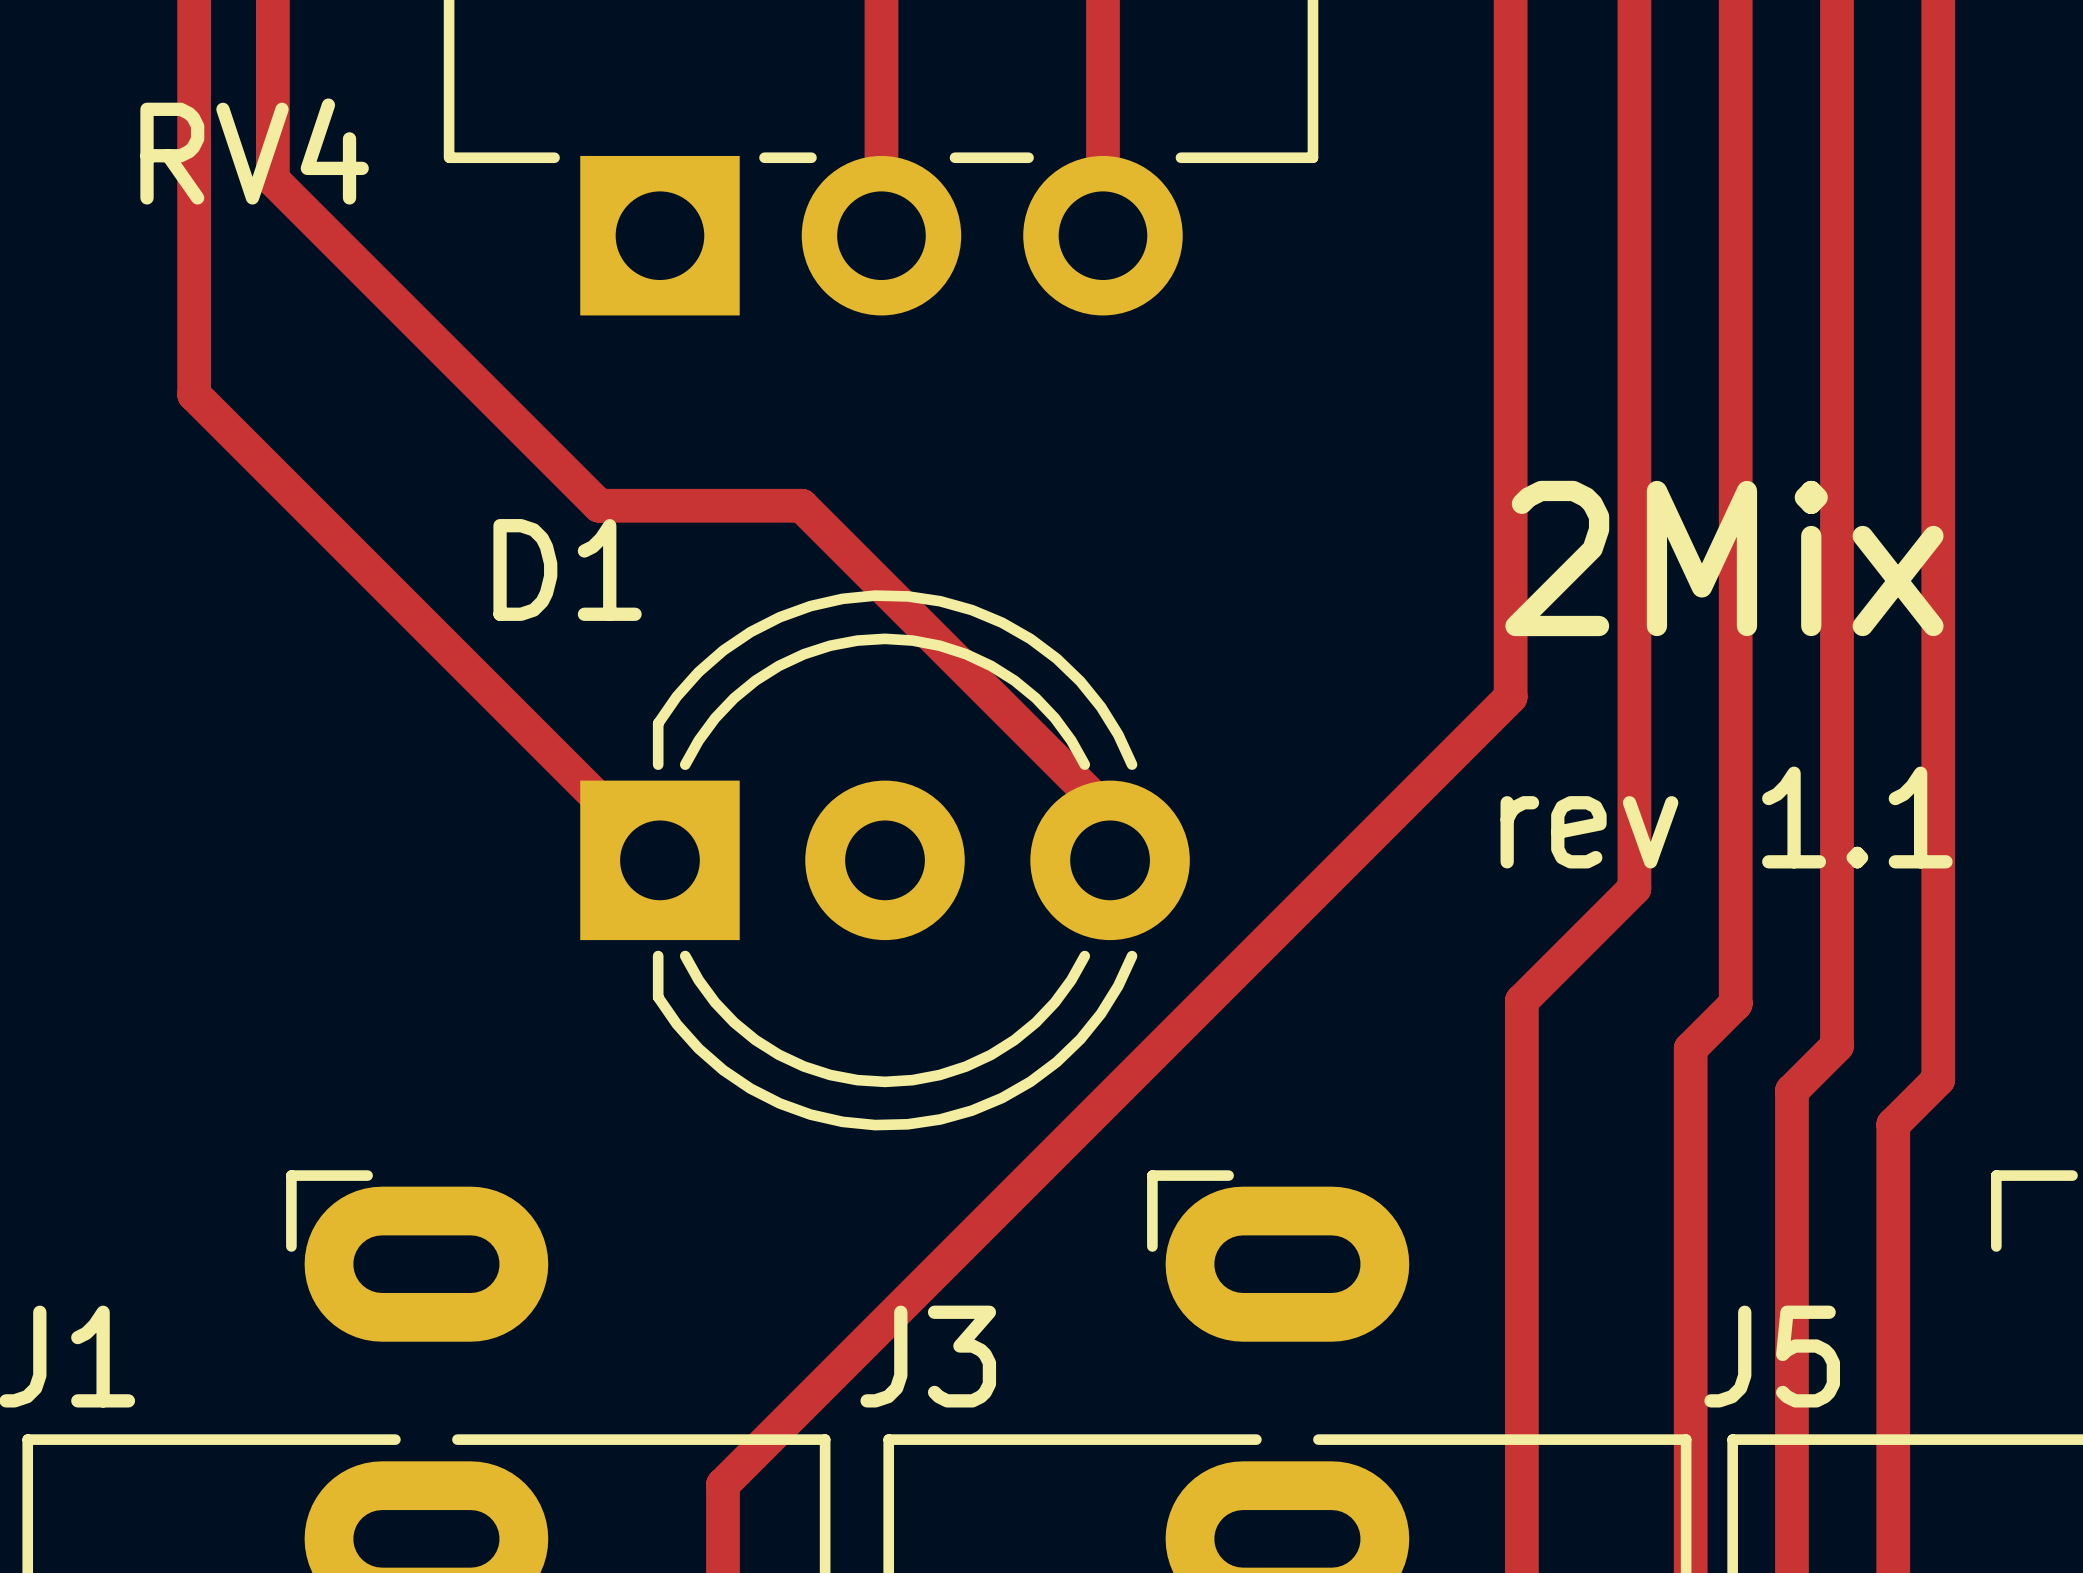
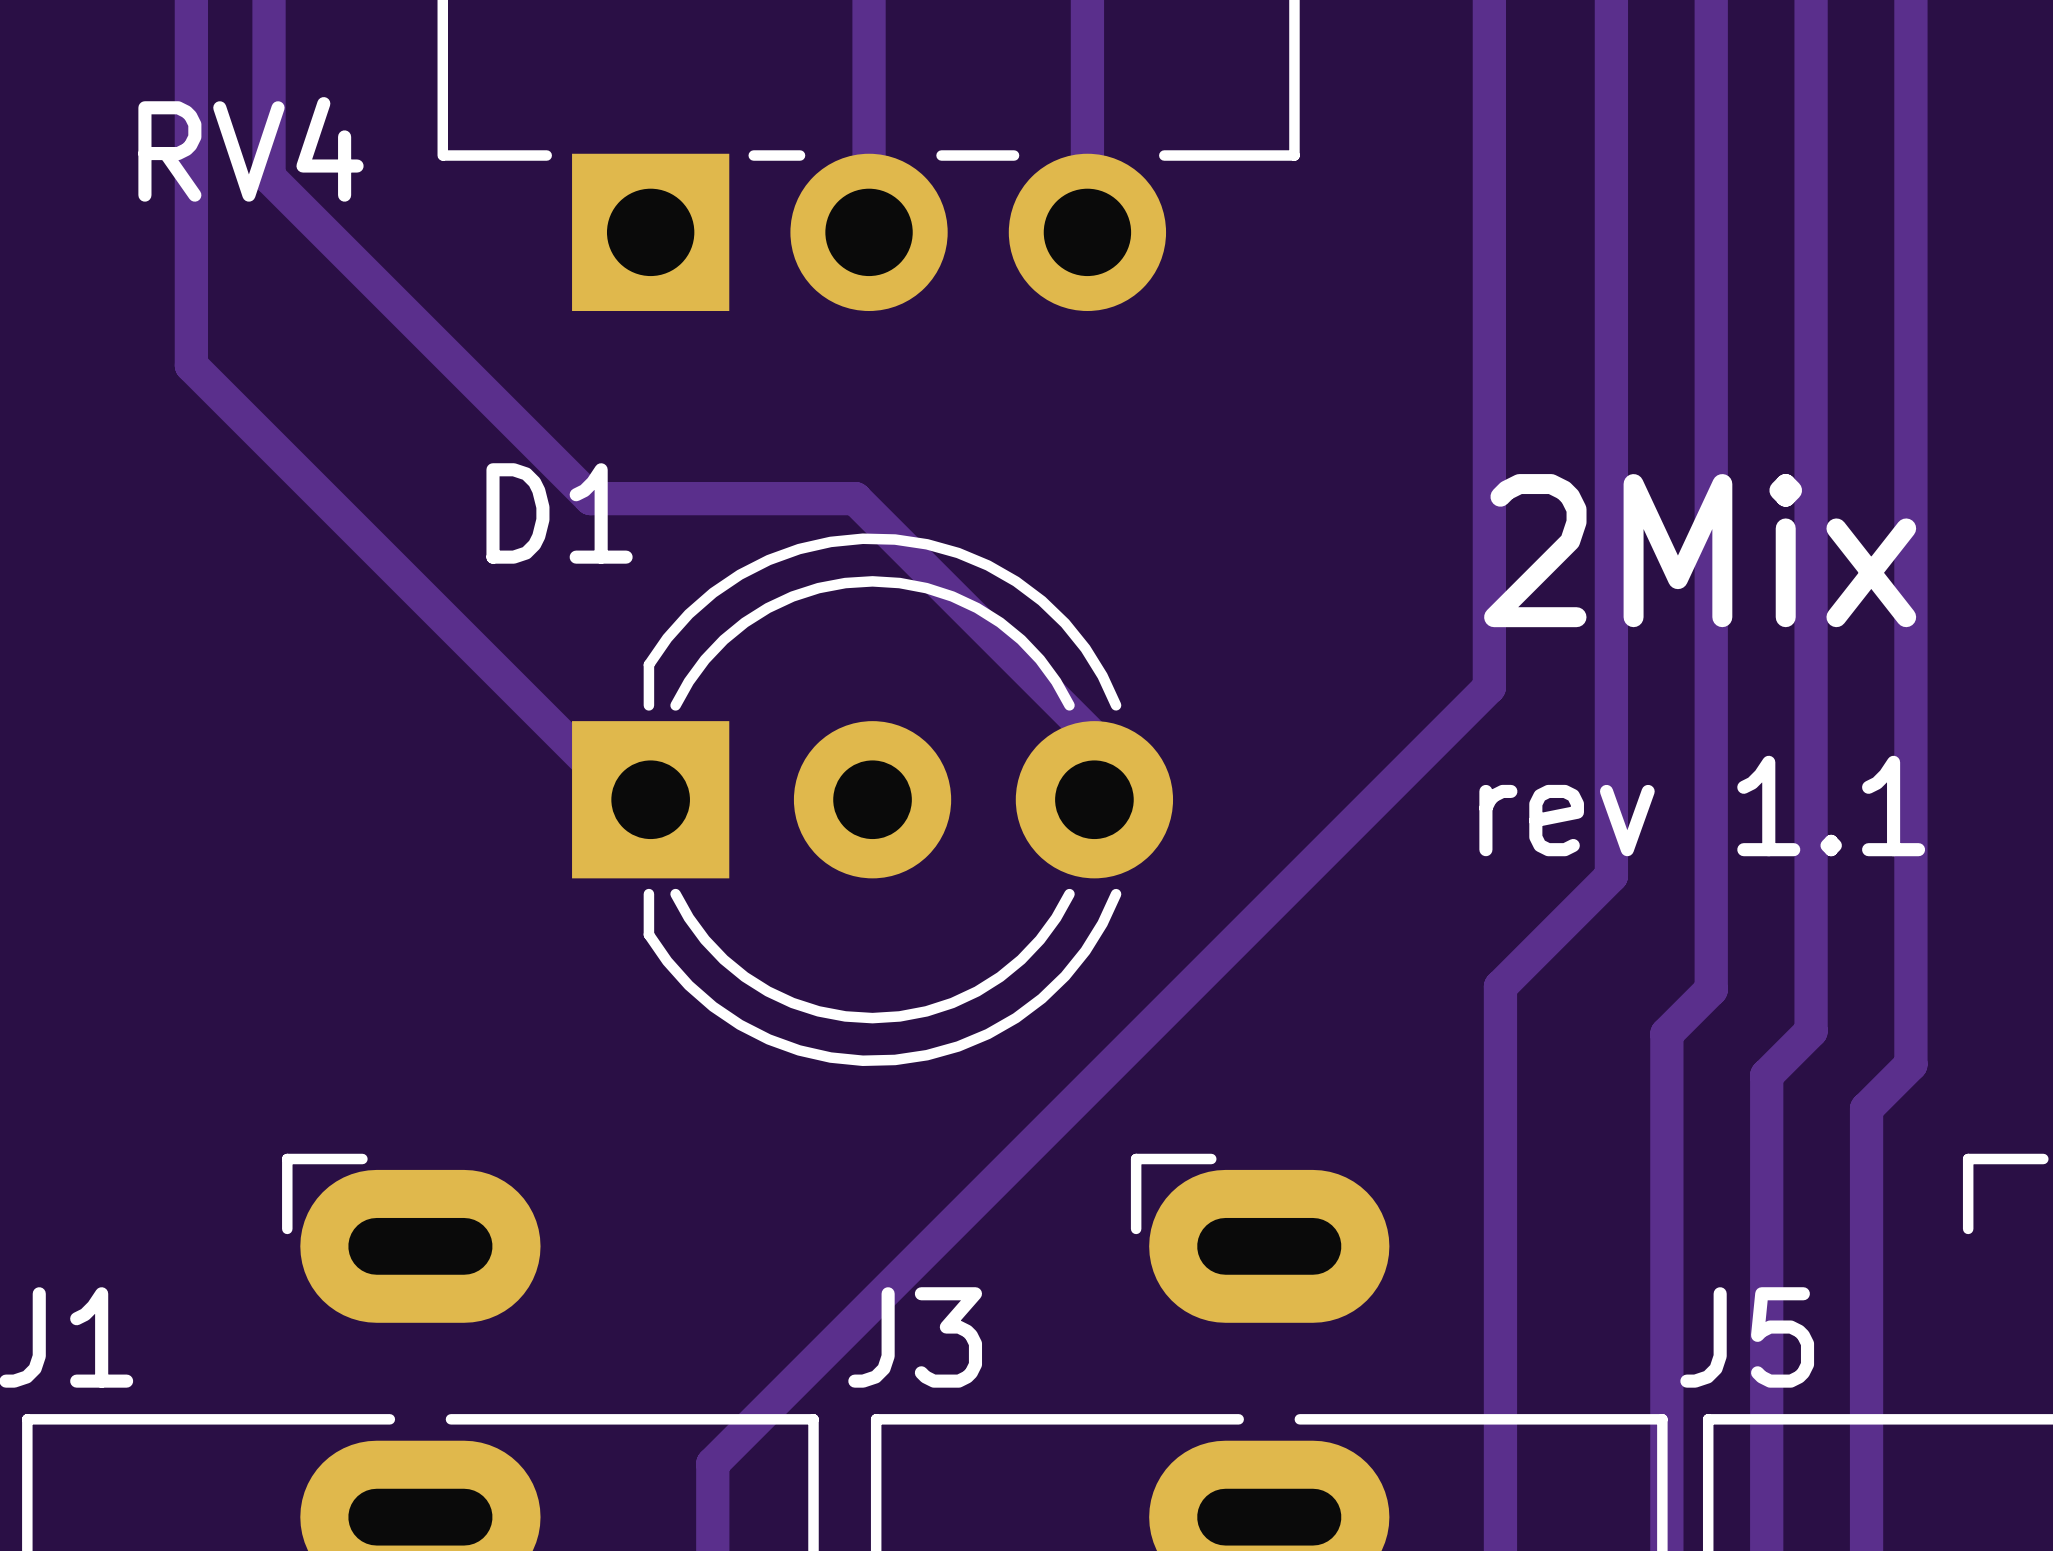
track: (194, 370) (194, 394) (659, 860) -> (191, 365) (625, 799) (650, 799)
track: (801, 505) (1110, 814) -> (790, 498) (855, 498) (1094, 737) (1094, 799)
D1 position: (885, 860) -> (872, 799)

